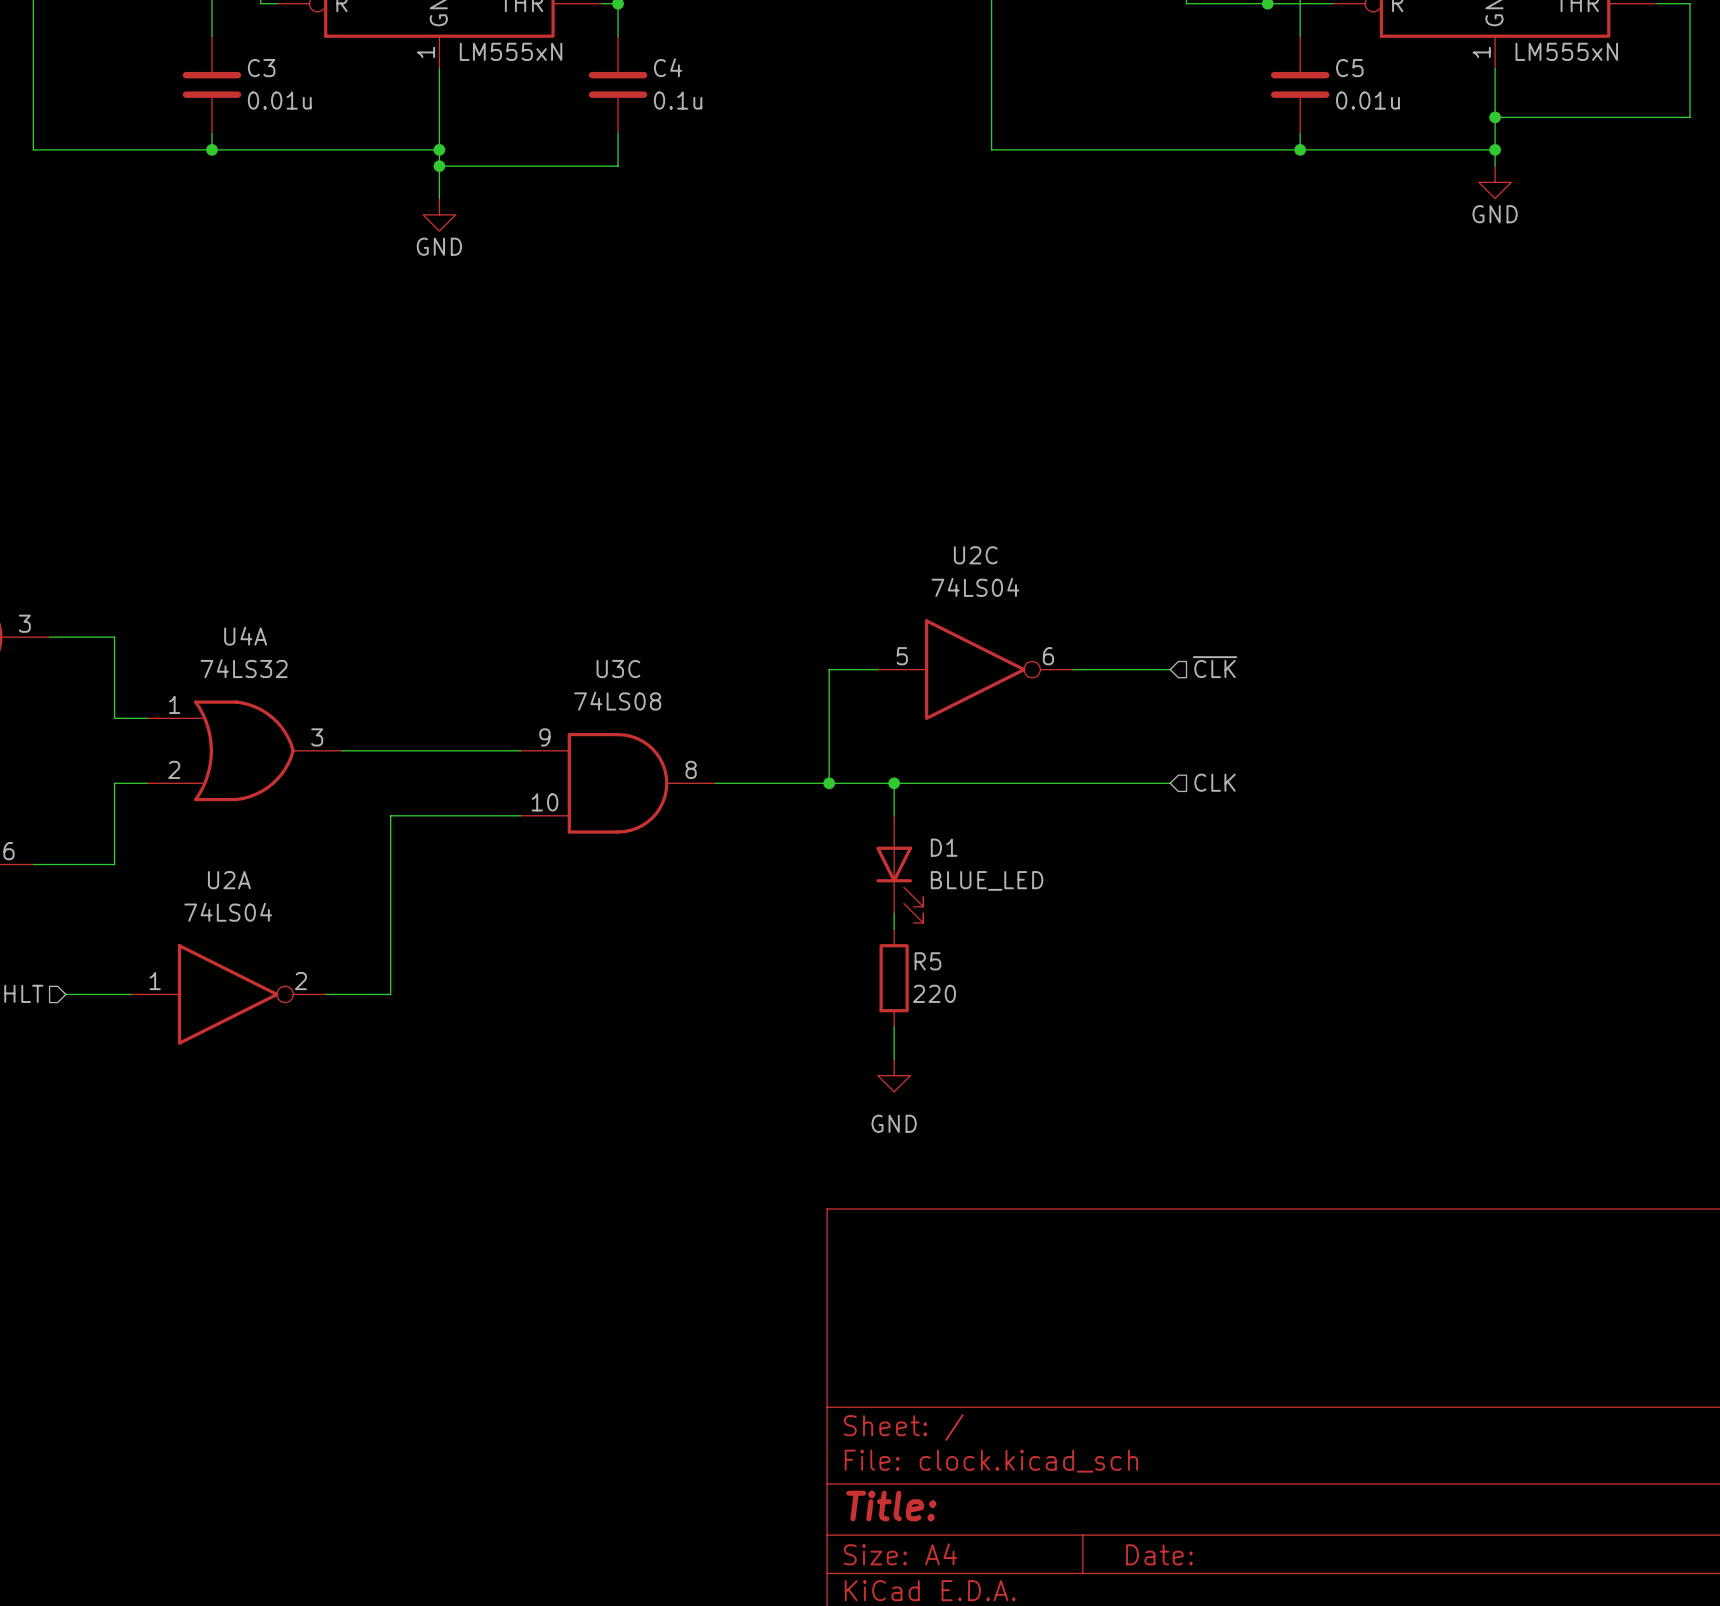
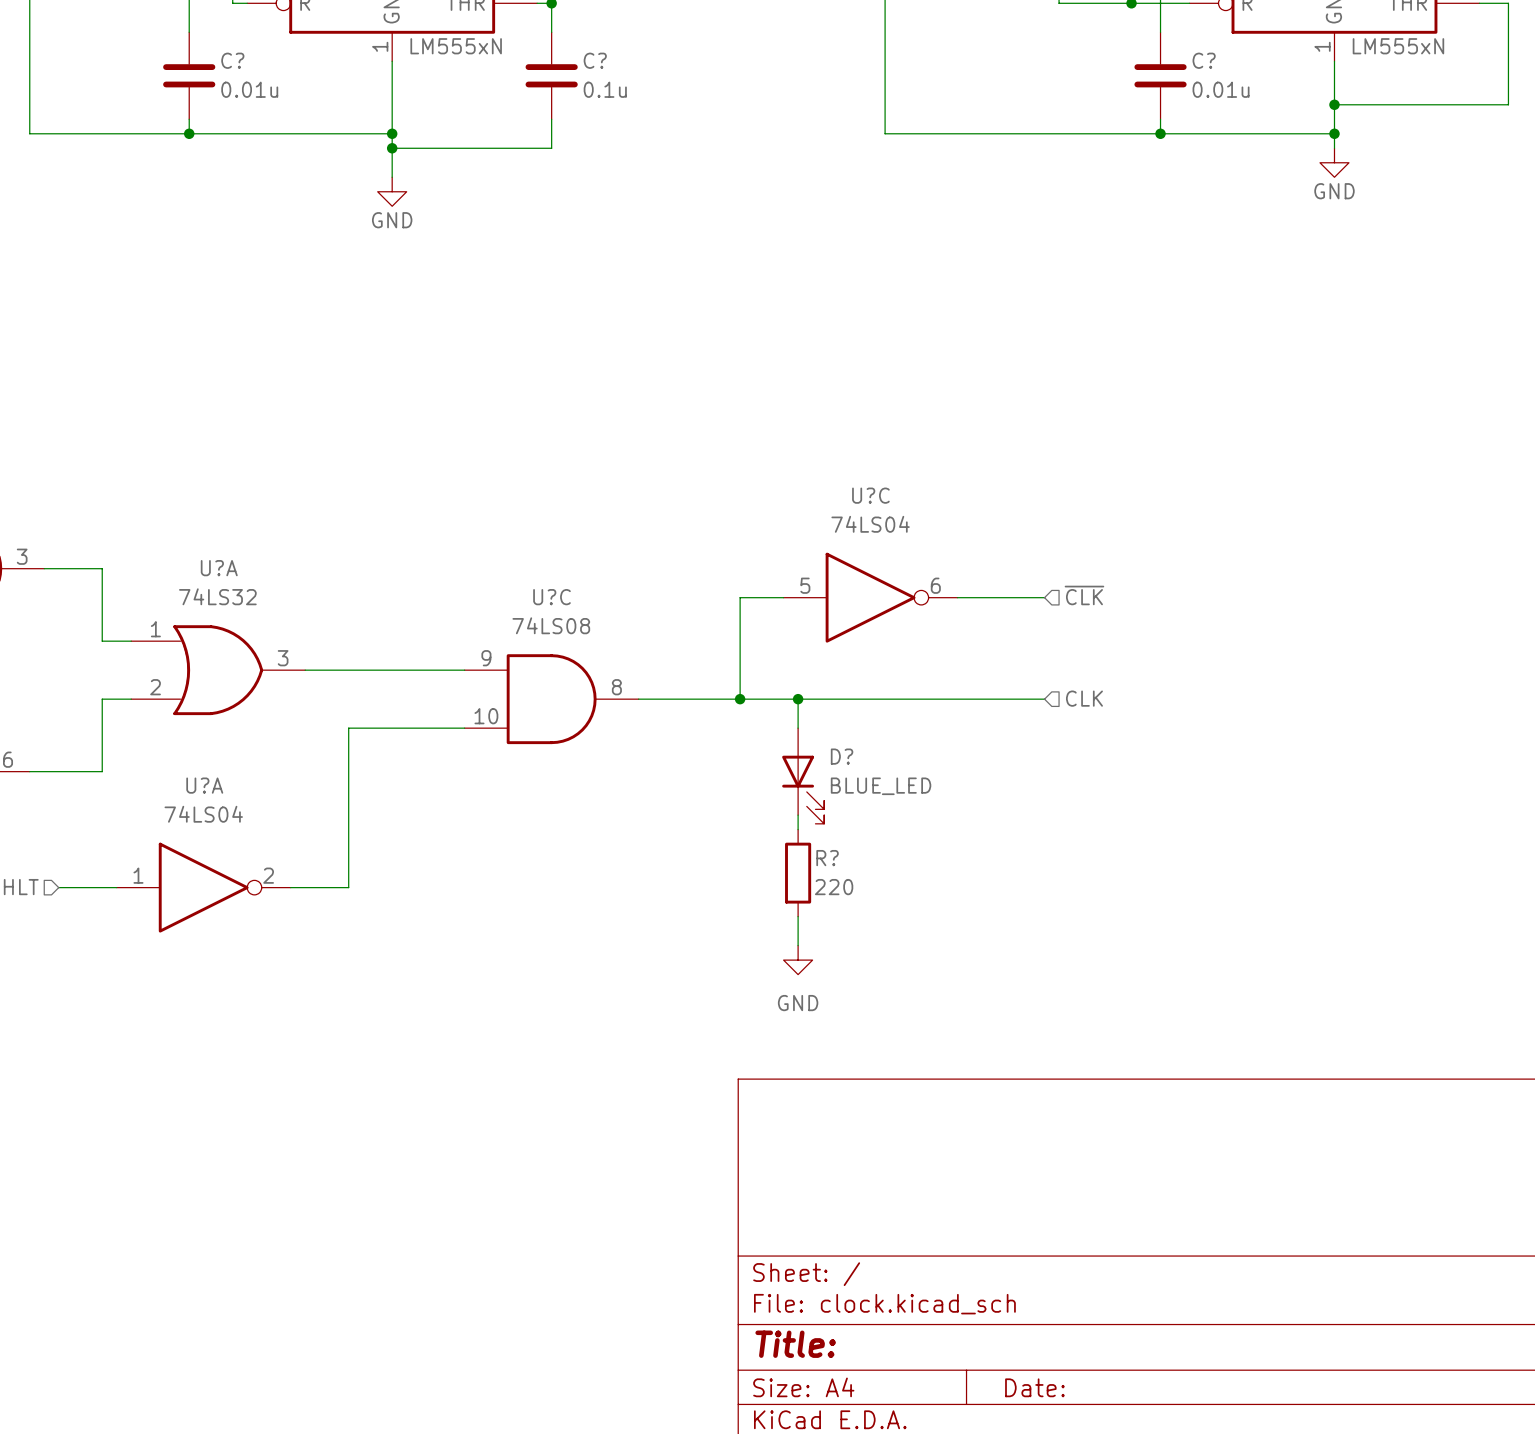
C4 name: C4 (668, 67) -> C? (595, 60)
C3 name: C3 (261, 68) -> C? (232, 60)
C5 name: C5 (1349, 68) -> C? (1204, 60)
U2C name: U2C (975, 555) -> U?C (870, 495)
U4A name: U4A (245, 636) -> U?A (219, 568)
U3C name: U3C (618, 669) -> U?C (551, 597)
D1 name: D1 (944, 847) -> D? (842, 756)
U2A name: U2A (229, 880) -> U?A (204, 785)
R5 name: R5 (927, 961) -> R? (827, 858)

